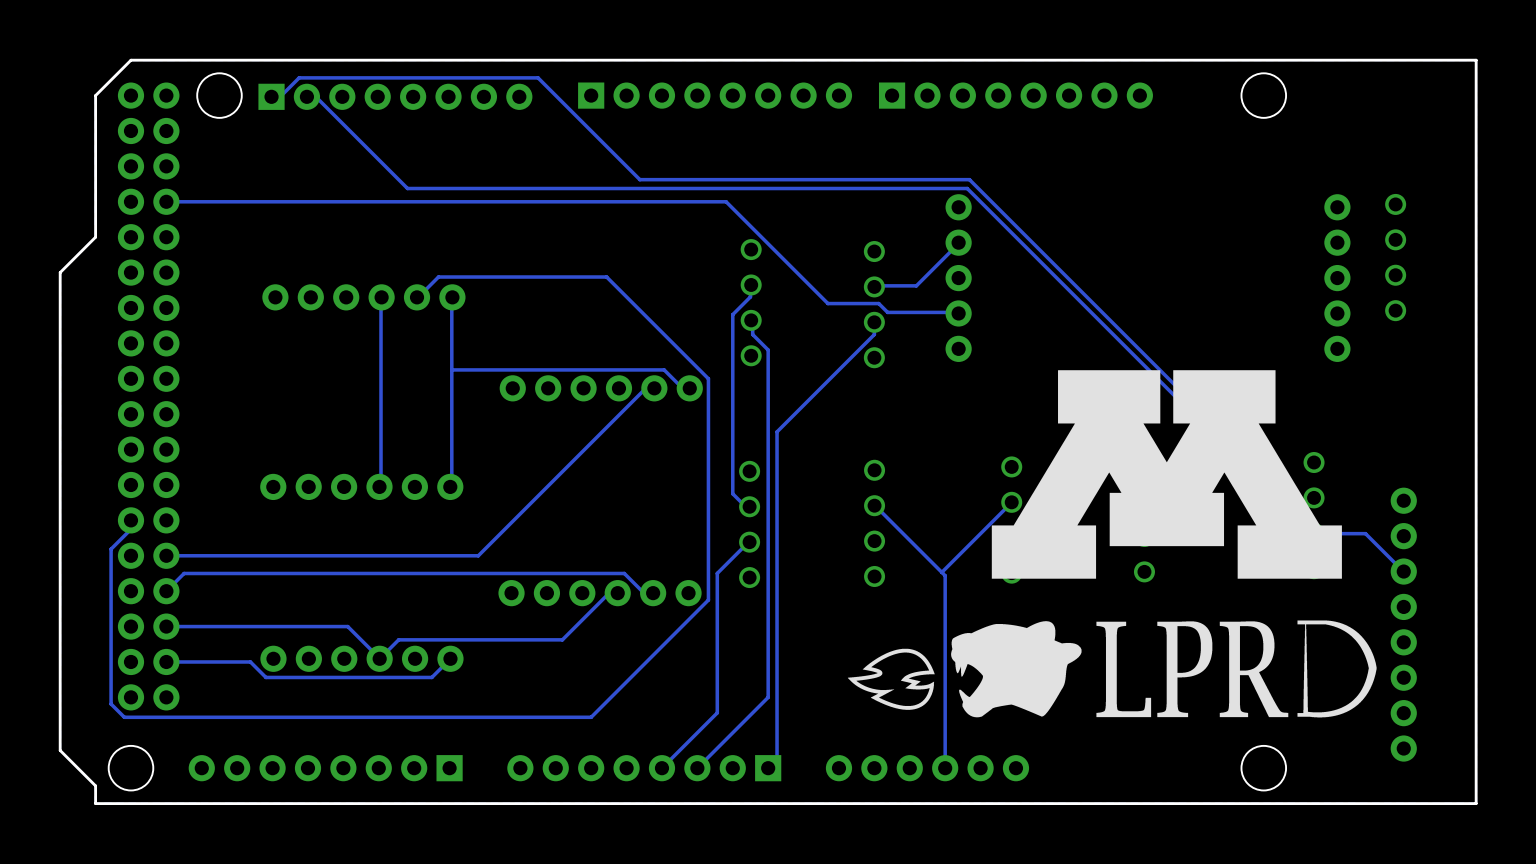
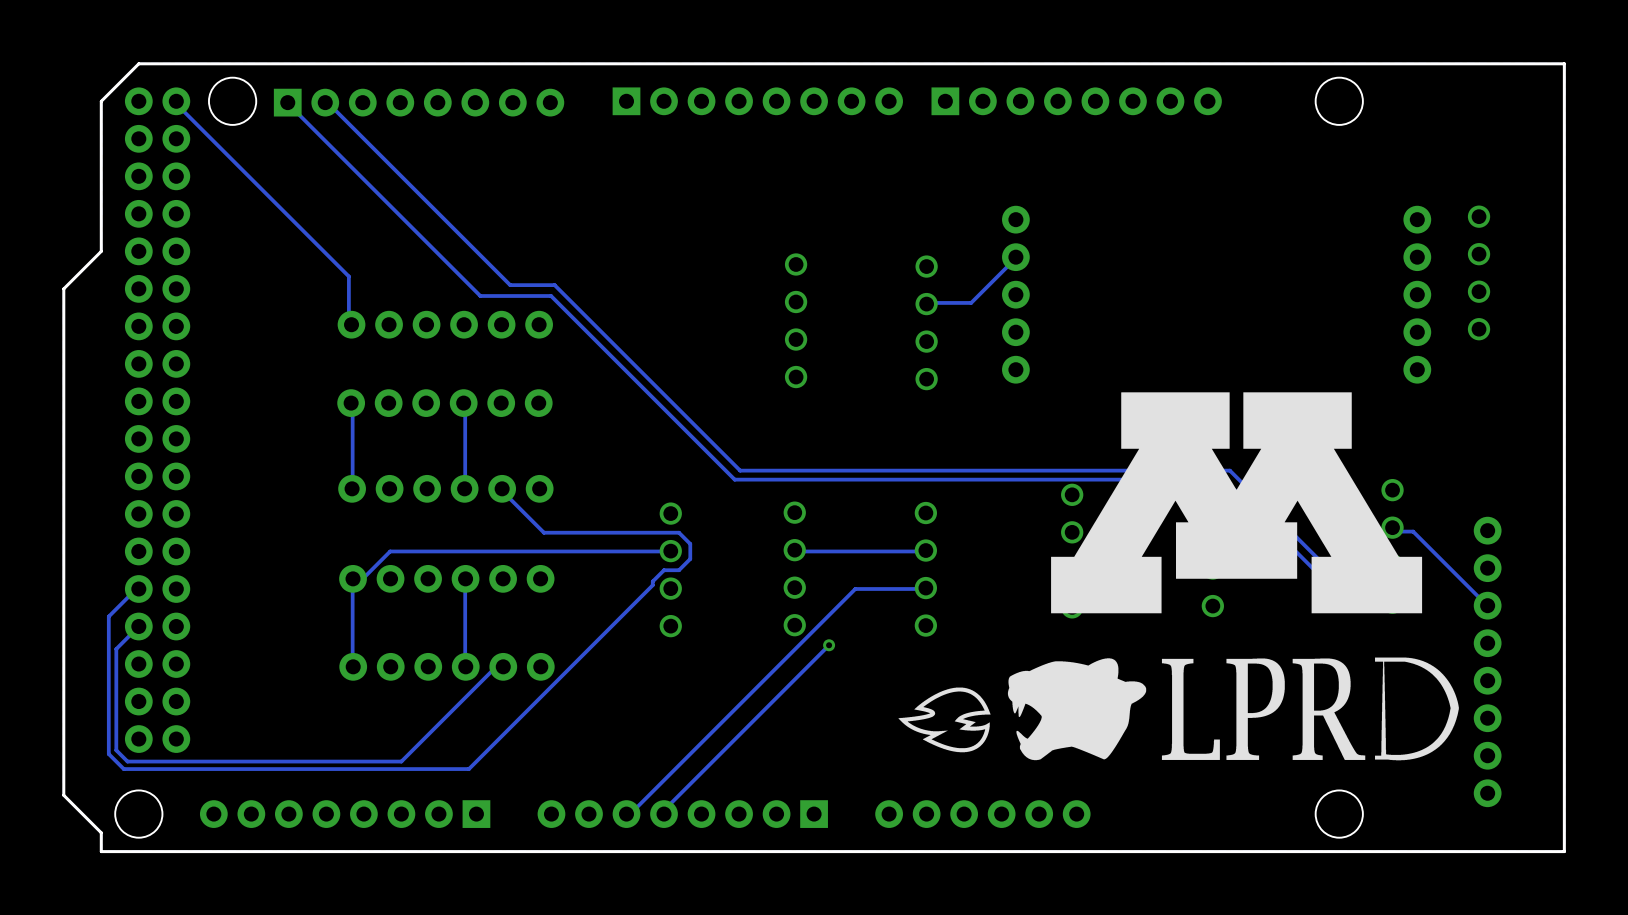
track: none -> (176, 101) (180, 101) (180, 107) (348, 276) (348, 322) (351, 324)
track: (271, 96) (281, 95) (299, 77) (538, 77) (639, 179) (969, 179) (1312, 522) (1314, 533) (1365, 533) -> (287, 102) (480, 296) (551, 296) (734, 479) (1224, 479) (1330, 585) (1344, 585) (1353, 576) (1353, 548) (1337, 531) (1413, 531) (1447, 565)
track: (306, 96) (316, 97) (407, 188) (967, 188) (1296, 518) (1296, 551) (1314, 568) -> (325, 102) (326, 101) (510, 285) (554, 285) (740, 470) (1229, 470) (1328, 569) (1337, 569)
track: (166, 201) (726, 201) (827, 303) (878, 303) (887, 312) (958, 313) -> none
track: (751, 284) (750, 296) (732, 314) (732, 493) (745, 506) (749, 506) -> none
part: (363, 297) -> none
track: (381, 297) (379, 486) -> none
track: (417, 297) (438, 277) (606, 277) (708, 378) (708, 600) (591, 717) (124, 717) (111, 704) (111, 549) (130, 529) (130, 520) -> none
track: (452, 297) (450, 486) -> none
part: none -> (445, 324)
track: (751, 320) (752, 334) (768, 350) (768, 697) (697, 768) -> none
track: (874, 322) (874, 334) (777, 431) (777, 759) (768, 768) -> none
track: (451, 369) (664, 369) (681, 387) (689, 388) -> none
track: none -> (351, 403) (352, 488)
part: none -> (444, 403)
track: none -> (463, 403) (464, 488)
part: (601, 388) -> none
track: (654, 388) (644, 389) (478, 555) (166, 555) -> none
part: none -> (445, 488)
track: none -> (502, 488) (543, 532) (679, 532) (690, 543) (690, 558) (679, 570) (664, 570) (652, 581) (652, 585) (468, 769) (123, 769) (108, 754) (108, 616) (135, 588) (138, 588)
part: (361, 486) -> none
track: (1011, 502) (941, 572) -> none
track: (874, 505) (945, 575) (945, 768) -> none
track: none -> (794, 550) (925, 550)
track: none -> (670, 551) (390, 551) (363, 577) (353, 578) (353, 666)
part position: (874, 523) -> (925, 569)
part position: (749, 524) -> (794, 568)
part: none -> (670, 569)
track: (749, 542) (717, 573) (717, 712) (661, 768) -> none
part: none -> (446, 578)
track: none -> (465, 578) (465, 666)
track: none -> (925, 588) (855, 588) (626, 817) (626, 814)
track: none -> (138, 626) (116, 649) (116, 750) (127, 761) (401, 761) (495, 667) (503, 666)
track: (166, 591) (184, 573) (624, 573) (642, 591) (653, 591) (653, 593) -> none
part: (600, 593) -> none
track: (617, 593) (608, 593) (562, 639) (398, 639) (379, 658) (347, 626) (166, 626) -> none
track: none -> (829, 645) (664, 810) (664, 814)
via: none -> (829, 645)
part: none -> (447, 666)
part: (361, 658) -> none
track: (450, 658) (431, 677) (265, 677) (250, 661) (166, 661) -> none

